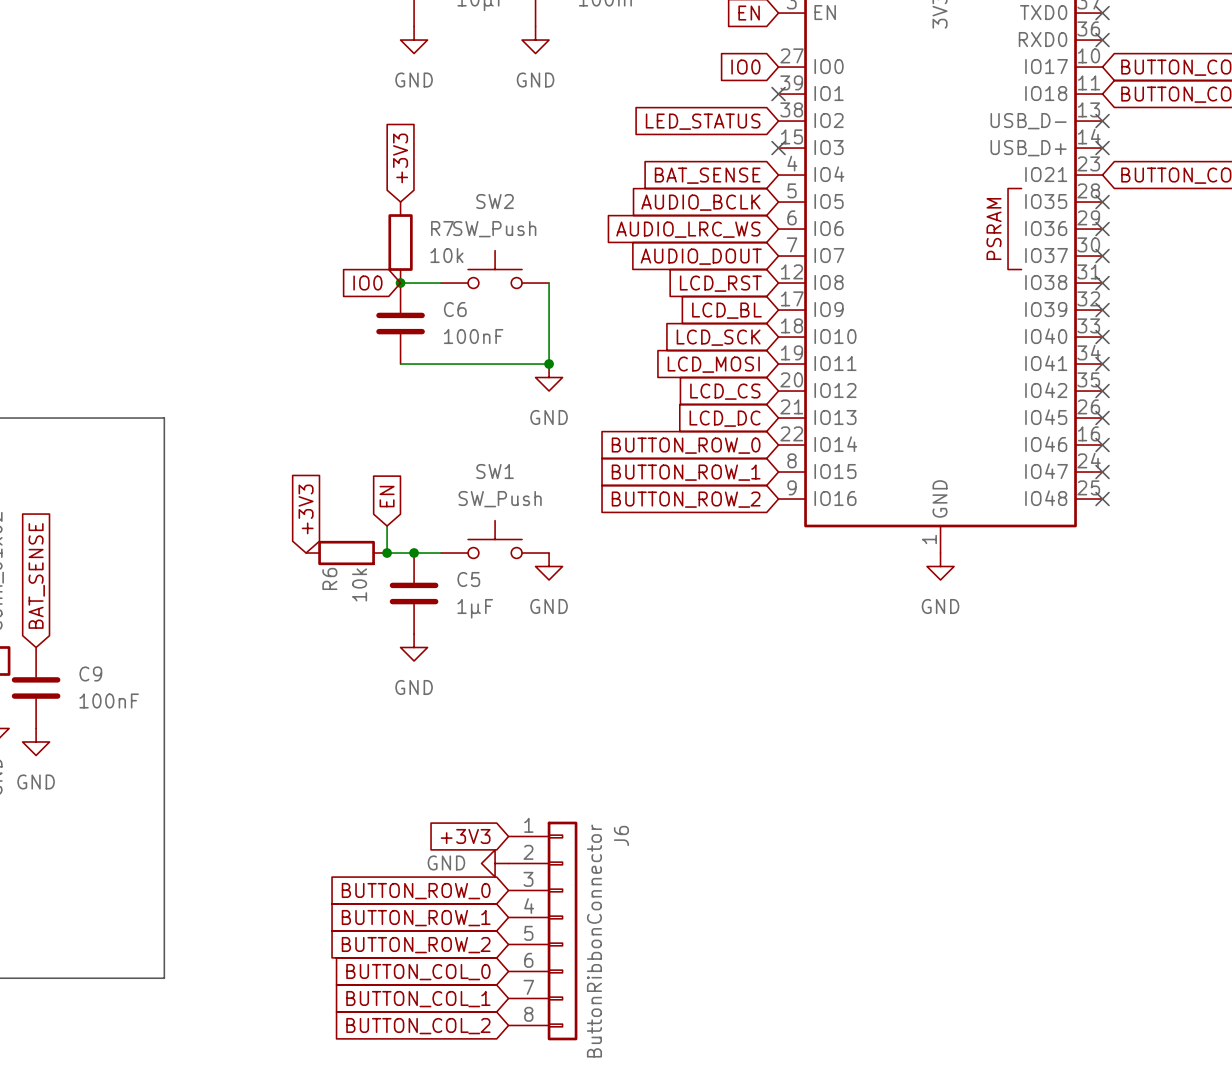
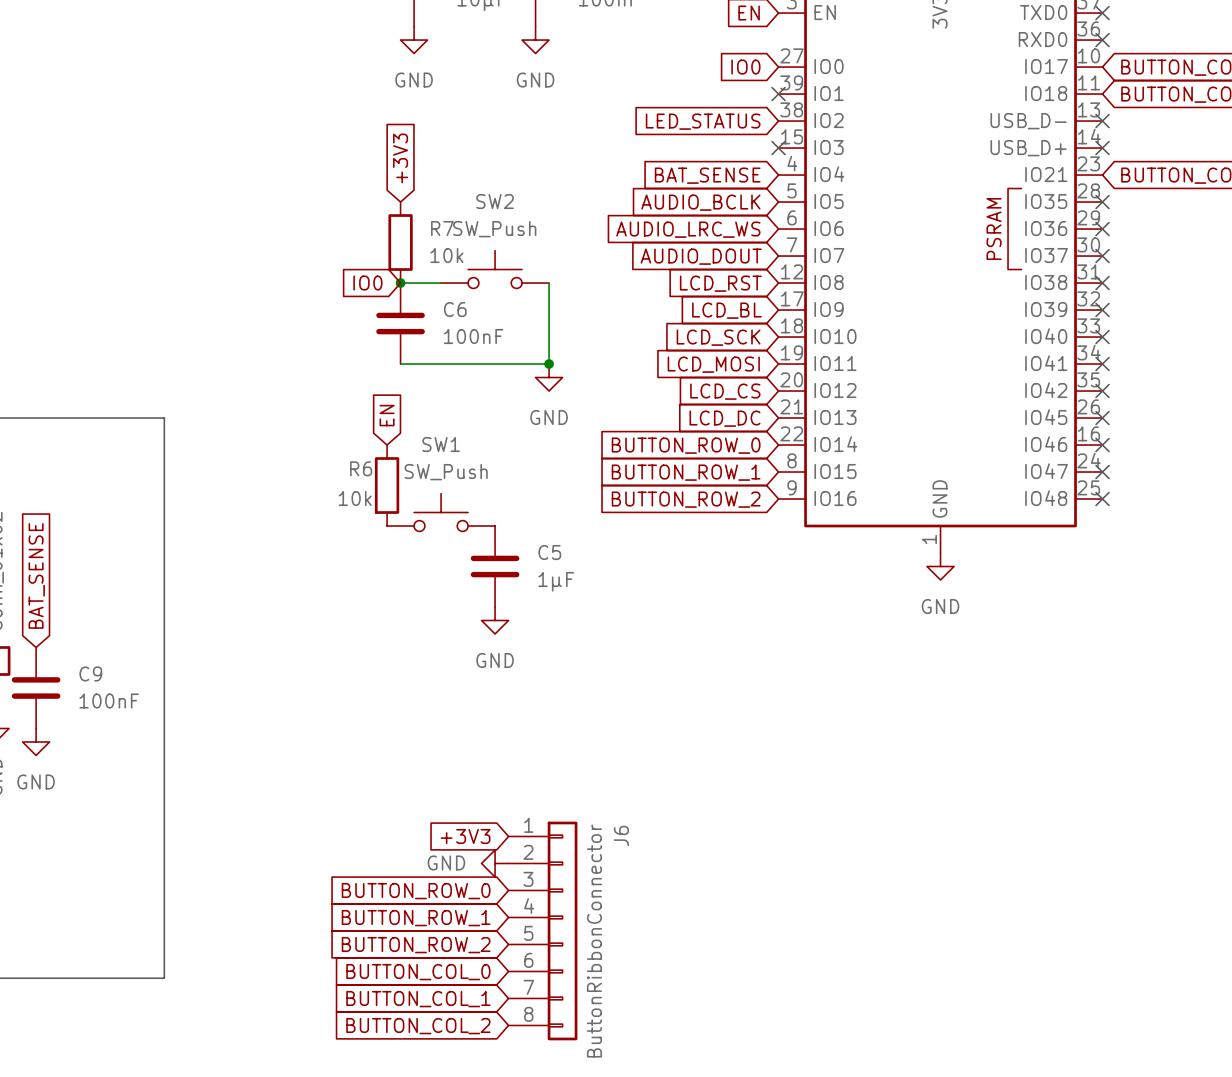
global label position: EN (387, 496) -> EN (387, 415)
global label: +3V3 (306, 509) -> none
wire: (387, 526) (387, 553) (441, 553) -> none
SW1 position: (495, 539) -> (441, 512)
R6 rotation: 0° (346, 553) -> 90° clockwise (387, 485)
R6 position: (346, 553) -> (387, 485)
junction: (387, 553) -> none
junction: (414, 553) -> none
power symbol: GND (549, 566) -> none
C5 position: (414, 593) -> (495, 566)
power symbol: none -> GND (495, 620)
power symbol: GND (414, 647) -> none

